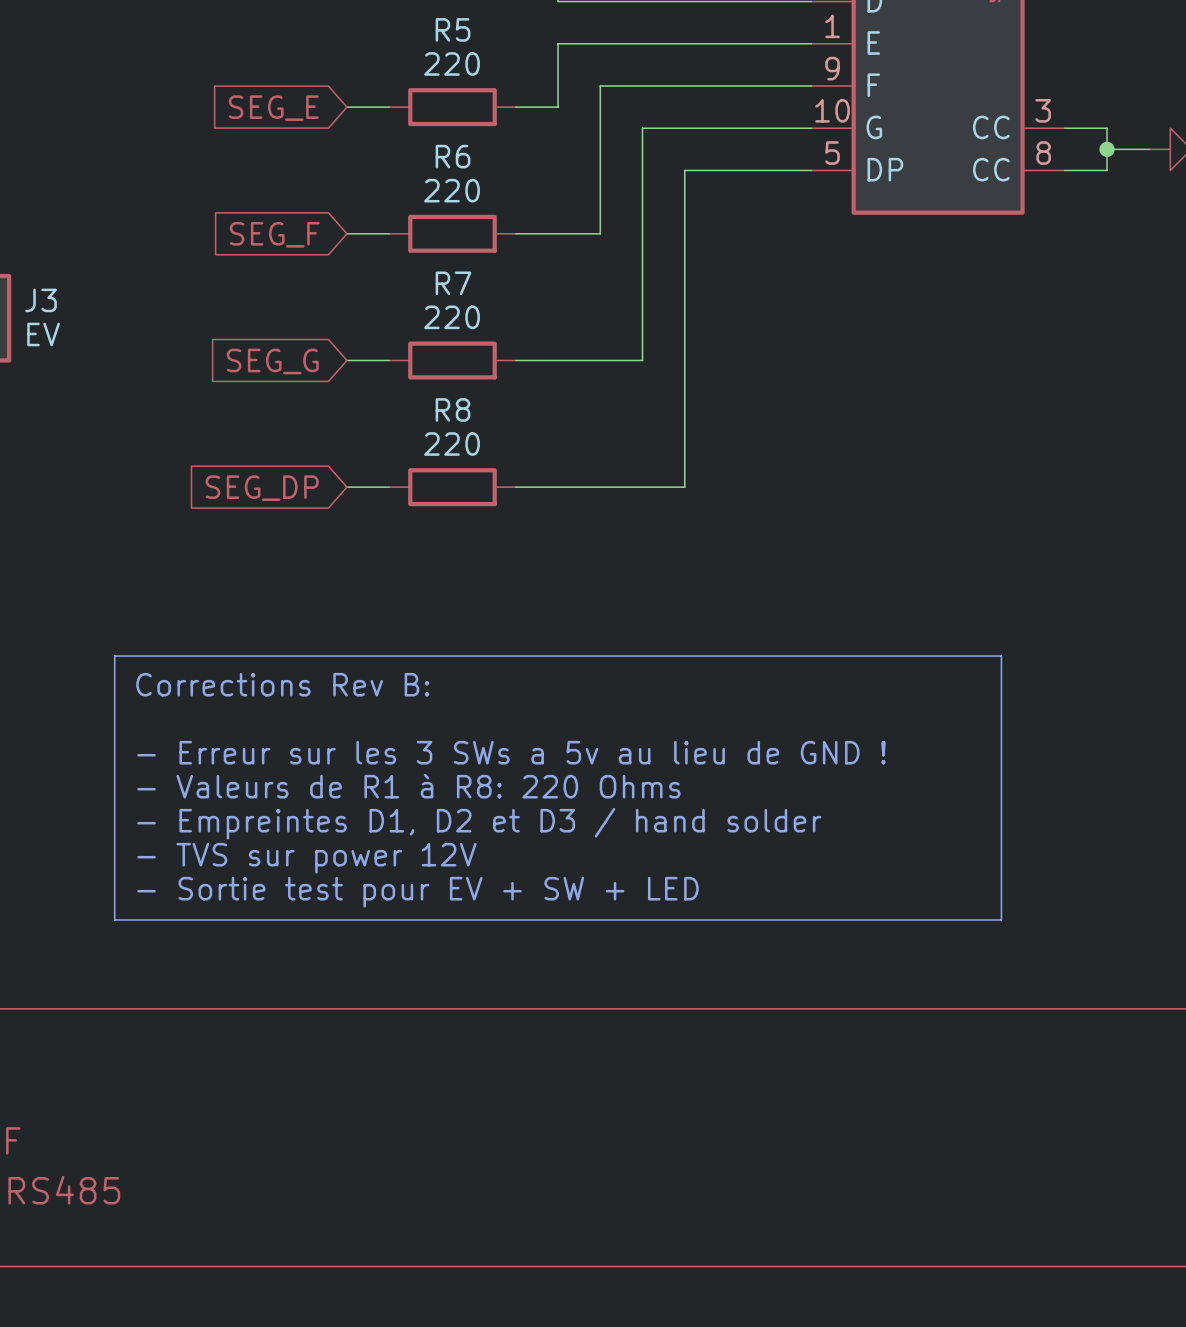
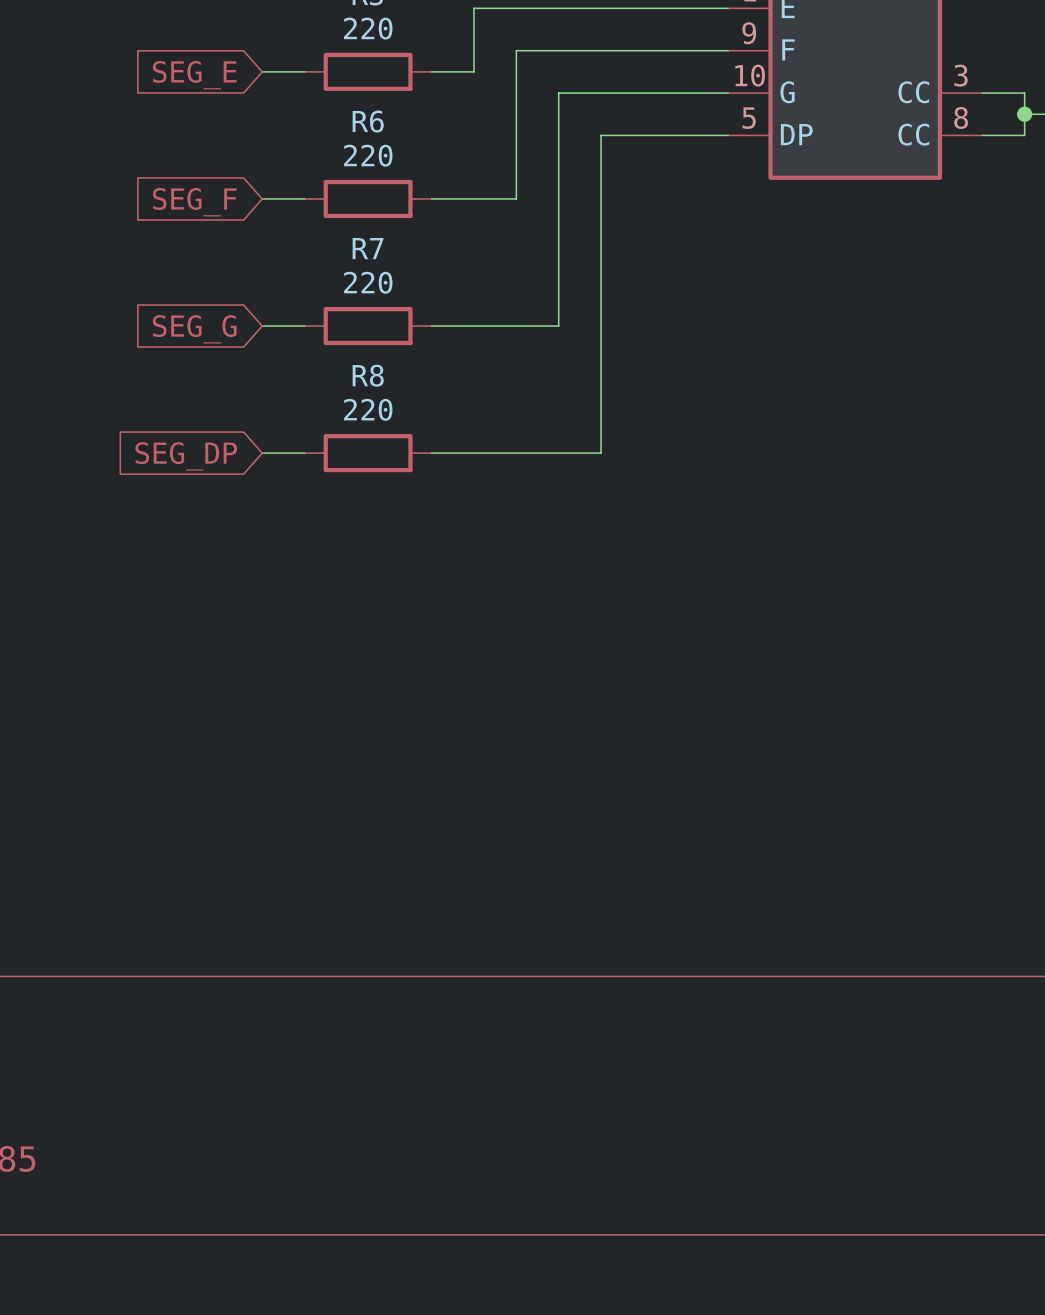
line: (114, 656) (1001, 656) (1001, 919) (114, 919) (114, 656) -> none
text: Corrections Rev B: (282, 684) -> none
text: - Erreur sur les 3 SWs a 5v au lieu de GND ! (511, 752) -> none
text: - Valeurs de R1 à R8: 220 Ohms (408, 786) -> none
text: - Empreintes D1, D2 et D3 / hand solder (479, 823) -> none
text: - TVS sur power 12V (306, 858) -> none
text: - Sortie test pour EV + SW + LED (417, 892) -> none

